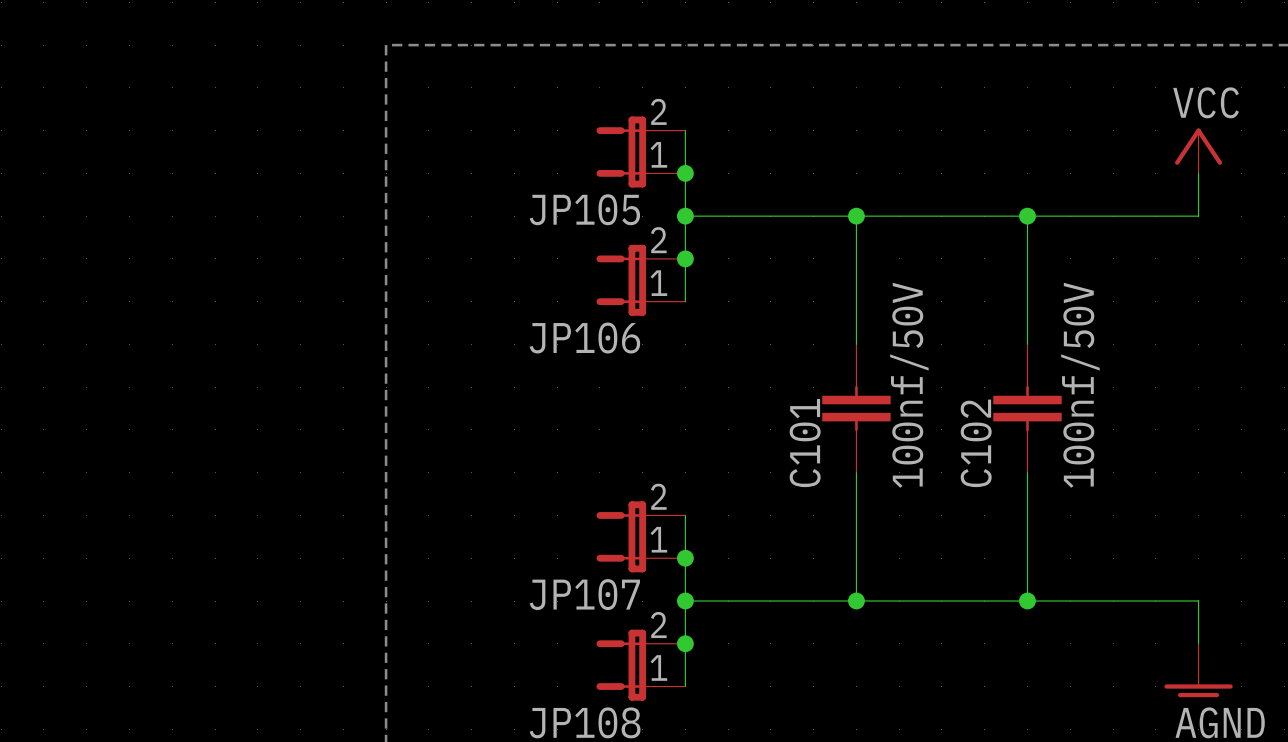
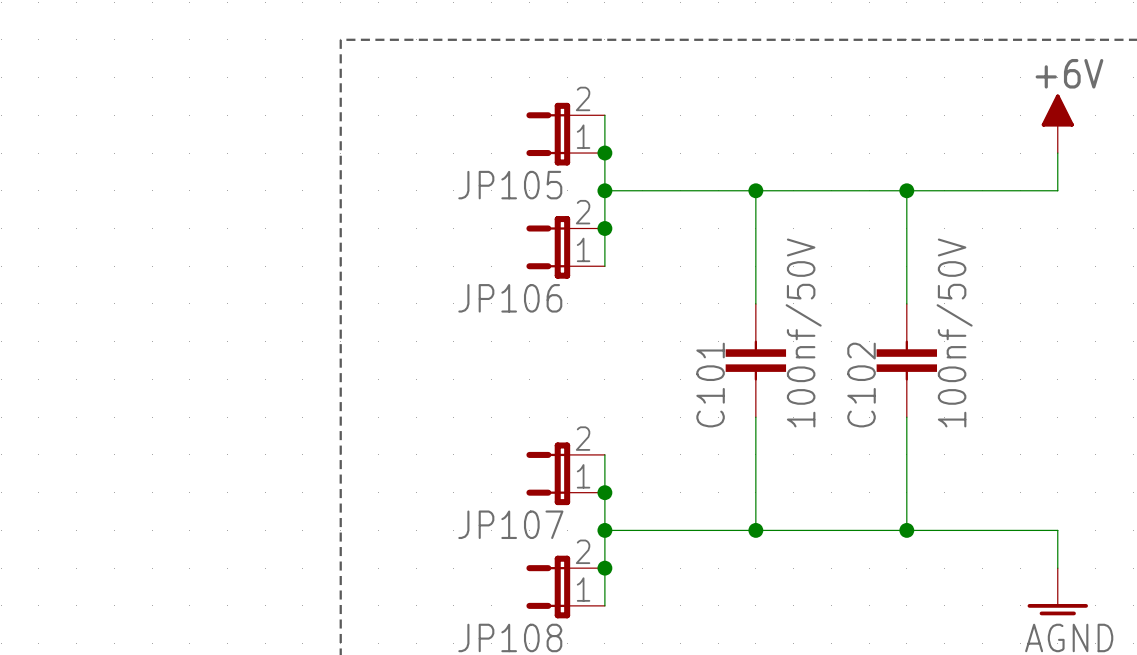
power symbol: VCC (1198, 150) -> +6V (1057, 123)

